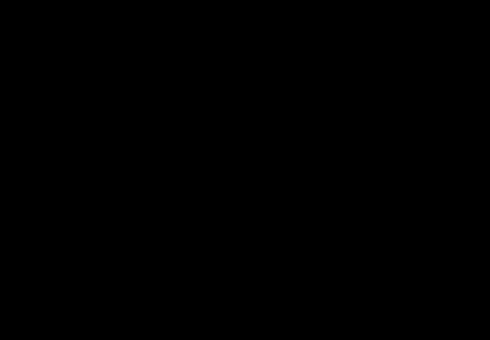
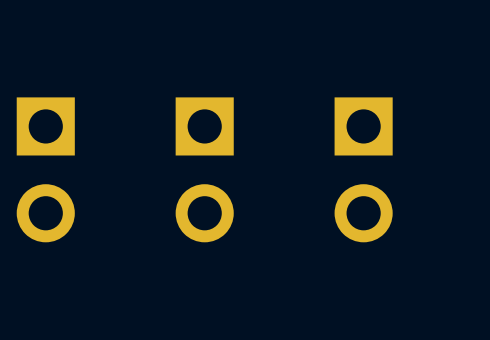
part: none -> (45, 169)
part: none -> (204, 169)
part: none -> (363, 169)

